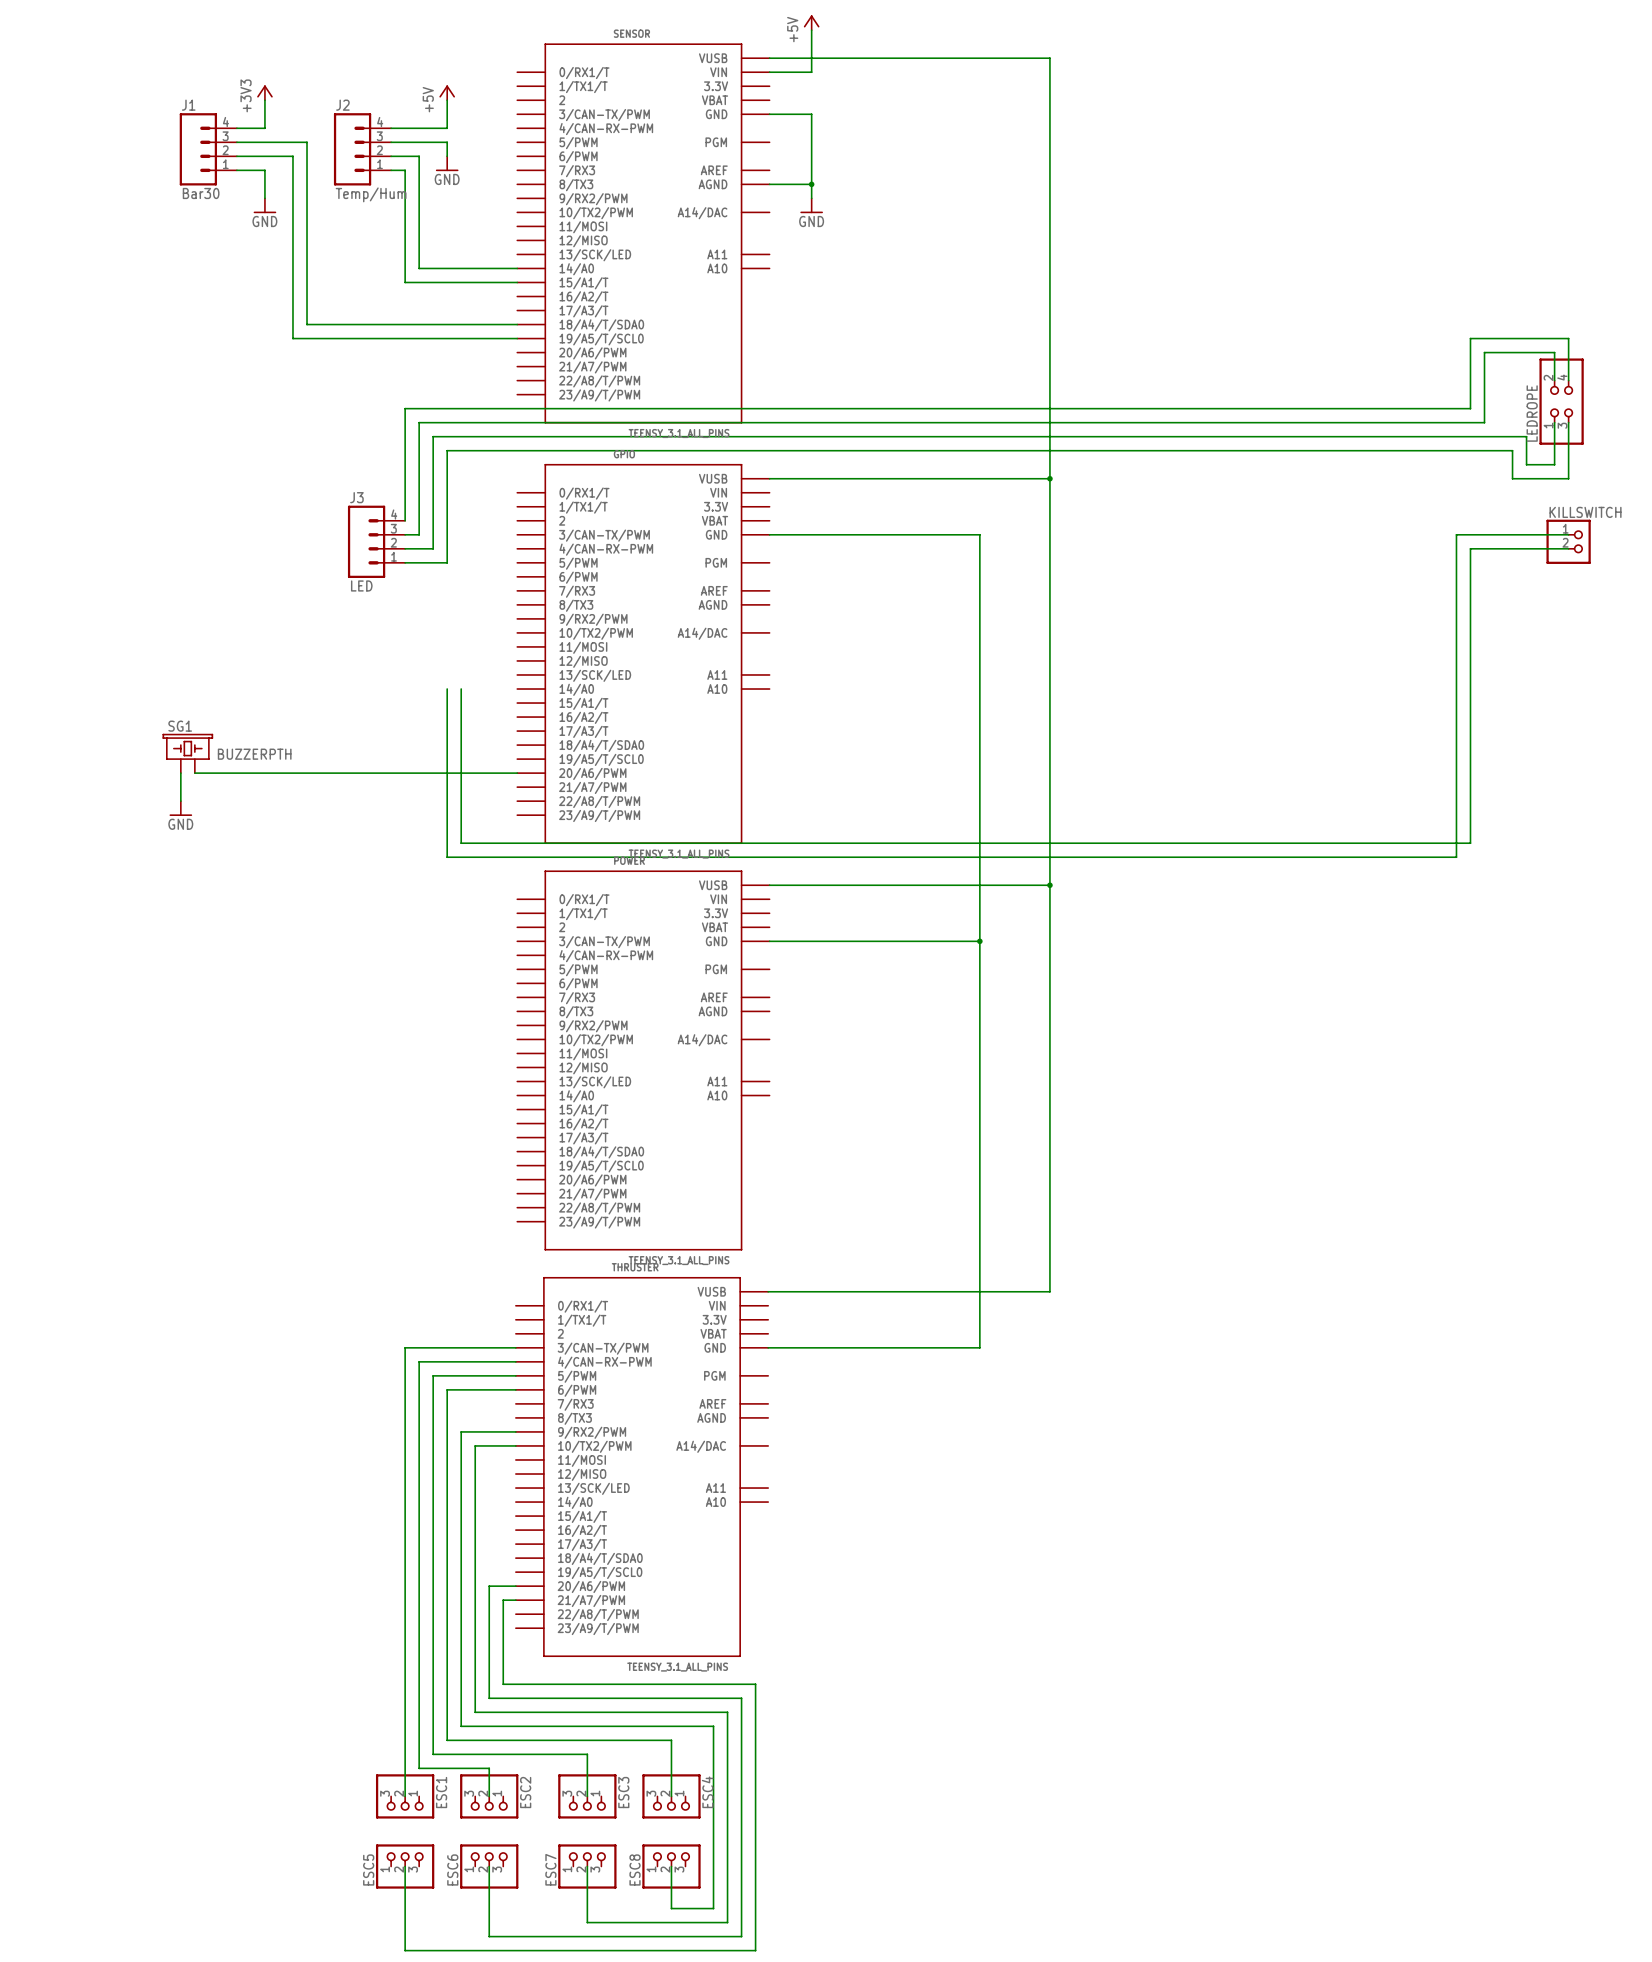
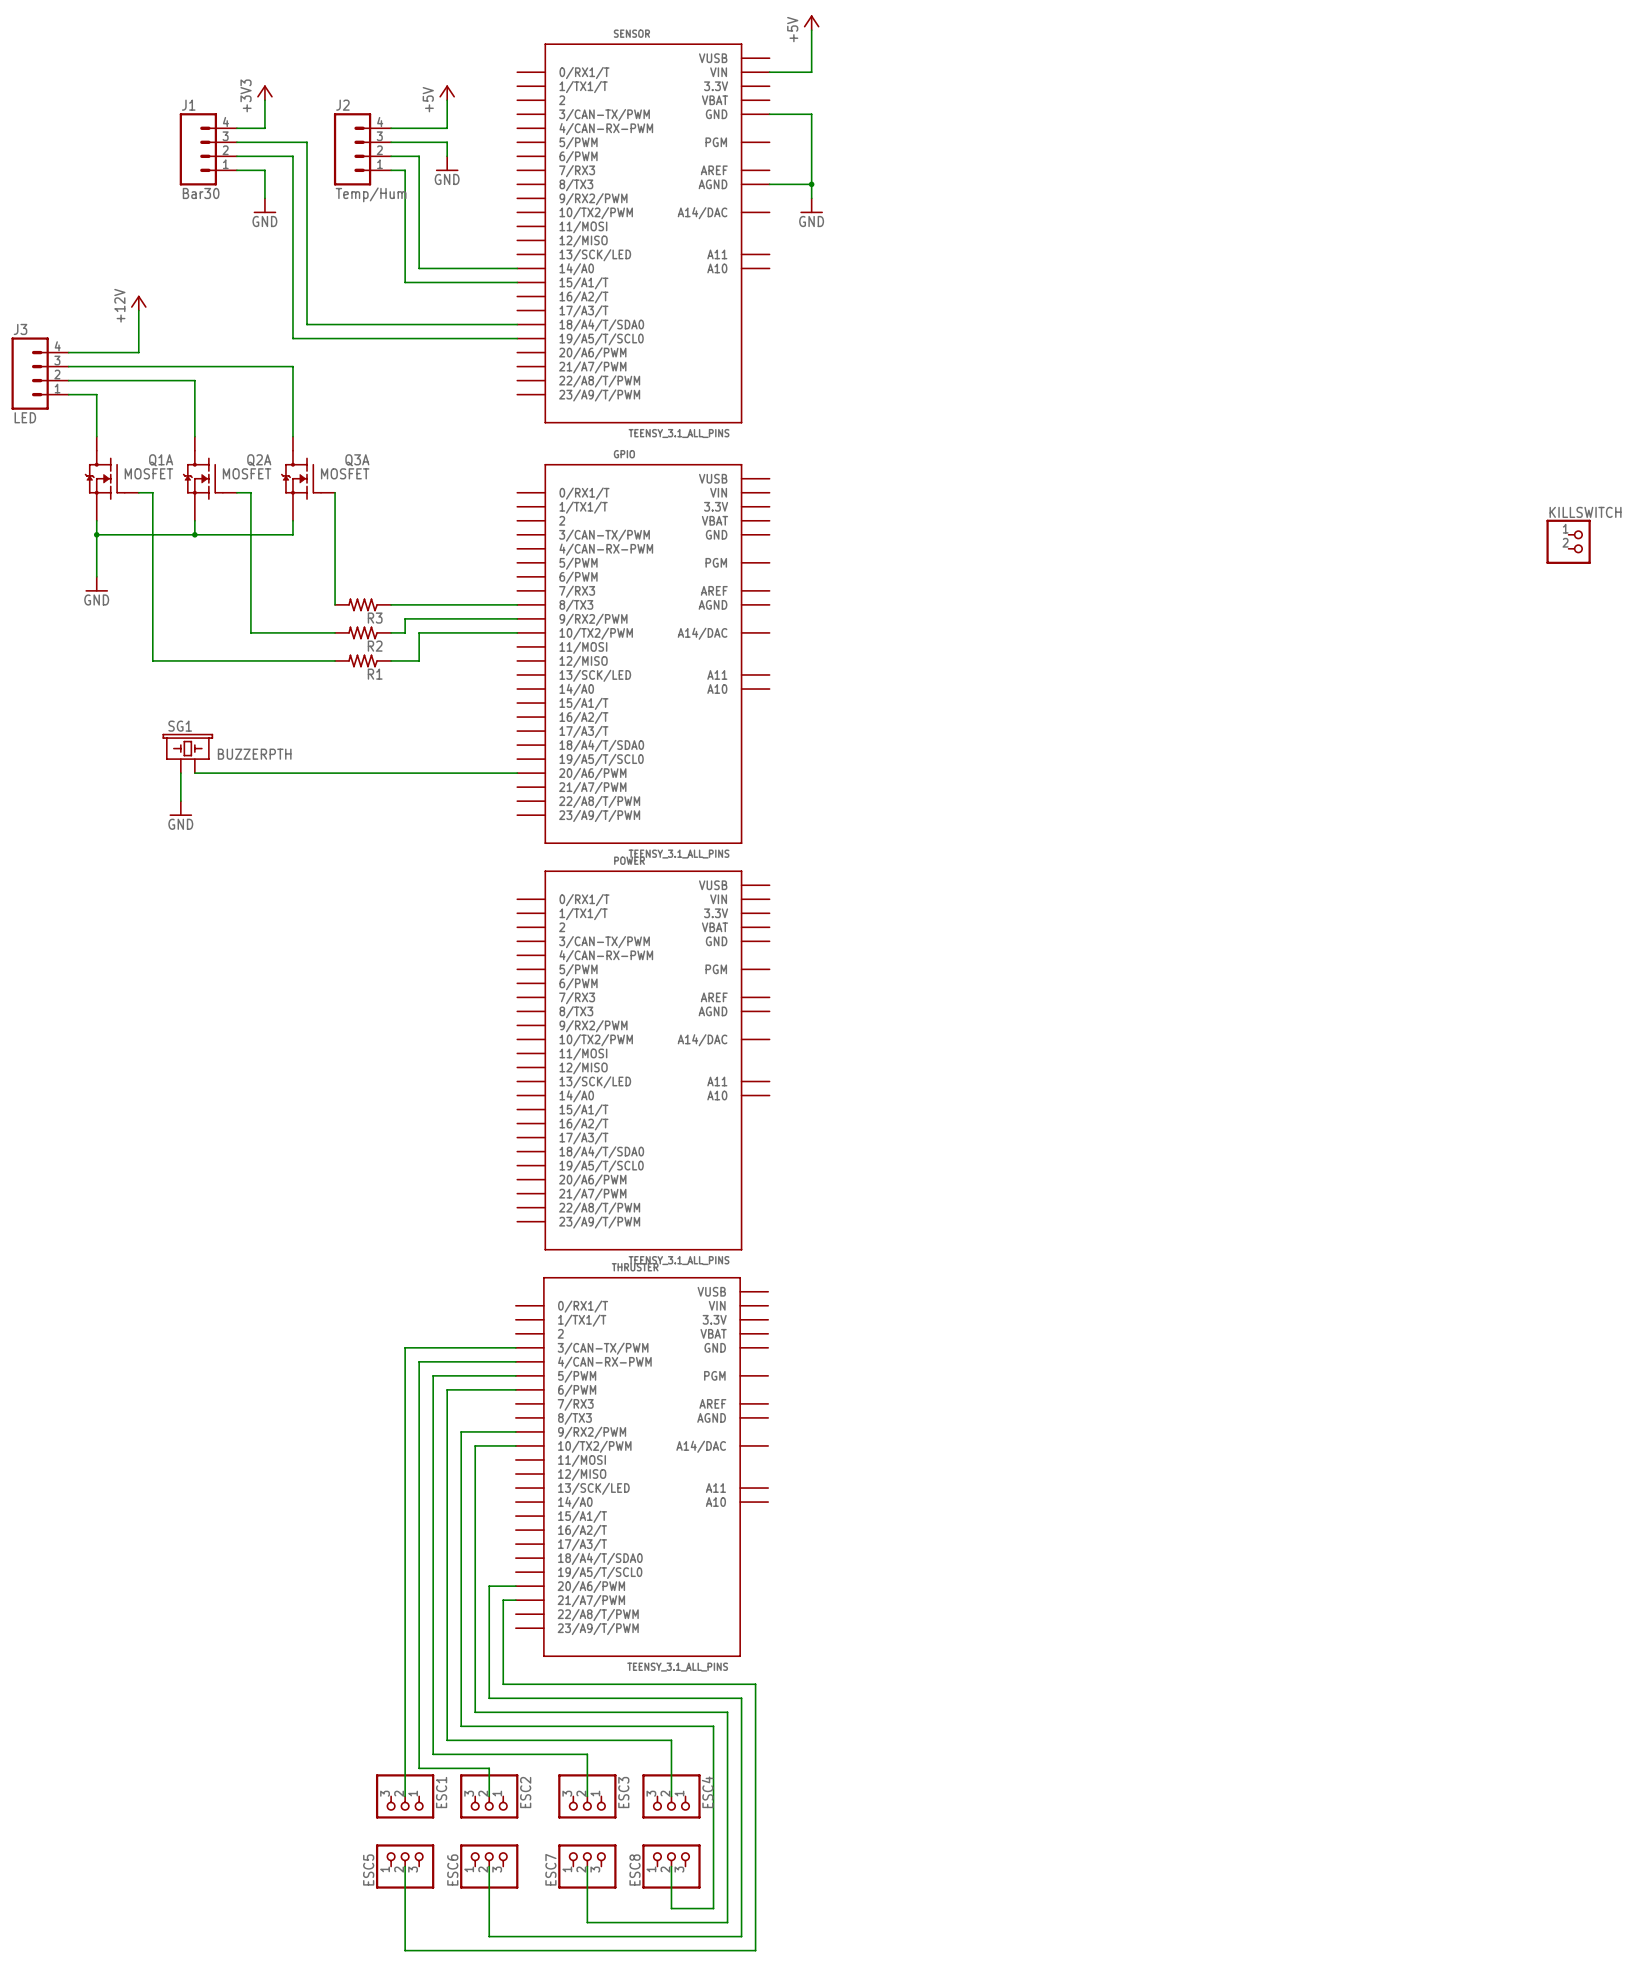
wire: (769, 58) (1049, 58) (1049, 1291) (768, 1291) -> none
power symbol: none -> +12V (138, 303)
wire: none -> (138, 310) (138, 352) (68, 352)
wire: none -> (68, 366) (292, 366) (292, 436)
wire: none -> (68, 380) (194, 380) (194, 436)
wire: (1554, 380) (1554, 352) (1484, 352) (1484, 422) (419, 422) (419, 534) (405, 534) -> none
wire: (1568, 380) (1568, 338) (1470, 338) (1470, 408) (405, 408) (405, 520) -> none
wire: none -> (68, 394) (96, 394) (96, 436)
LEDROPE: (1561, 401) -> none
wire: (1554, 422) (1554, 464) (1526, 464) (1526, 436) (433, 436) (433, 548) (405, 548) -> none
wire: (1568, 422) (1568, 478) (1512, 478) (1512, 450) (447, 450) (447, 562) (405, 562) -> none
Q1A: none -> MOSFET (111, 478)
Q2A: none -> MOSFET (210, 478)
Q3A: none -> MOSFET (308, 478)
wire: (769, 478) (1049, 478) -> none
junction: (1049, 478) -> none
wire: none -> (138, 492) (152, 492) (152, 660) (335, 660)
wire: none -> (236, 492) (250, 492) (250, 632) (335, 632)
wire: none -> (335, 492) (335, 604)
wire: none -> (96, 520) (96, 576)
wire: none -> (194, 520) (194, 534)
wire: none -> (292, 520) (292, 534) (96, 534)
junction: none -> (96, 534)
junction: none -> (194, 534)
wire: (769, 534) (979, 534) (979, 1347) (768, 1347) -> none
wire: (1568, 534) (1456, 534) (1456, 857) (447, 857) (447, 689) -> none
J3 position: (376, 541) -> (40, 373)
wire: (1568, 548) (1470, 548) (1470, 843) (461, 843) (461, 689) -> none
power symbol: none -> GND (96, 584)
R3: none -> (363, 604)
wire: none -> (391, 604) (517, 604)
wire: none -> (517, 618) (405, 618) (405, 632) (391, 632)
R2: none -> (363, 632)
wire: none -> (517, 632) (419, 632) (419, 660) (391, 660)
R1: none -> (363, 660)
wire: (769, 885) (1049, 885) -> none
junction: (1049, 885) -> none
wire: (769, 941) (979, 941) -> none
junction: (979, 941) -> none

